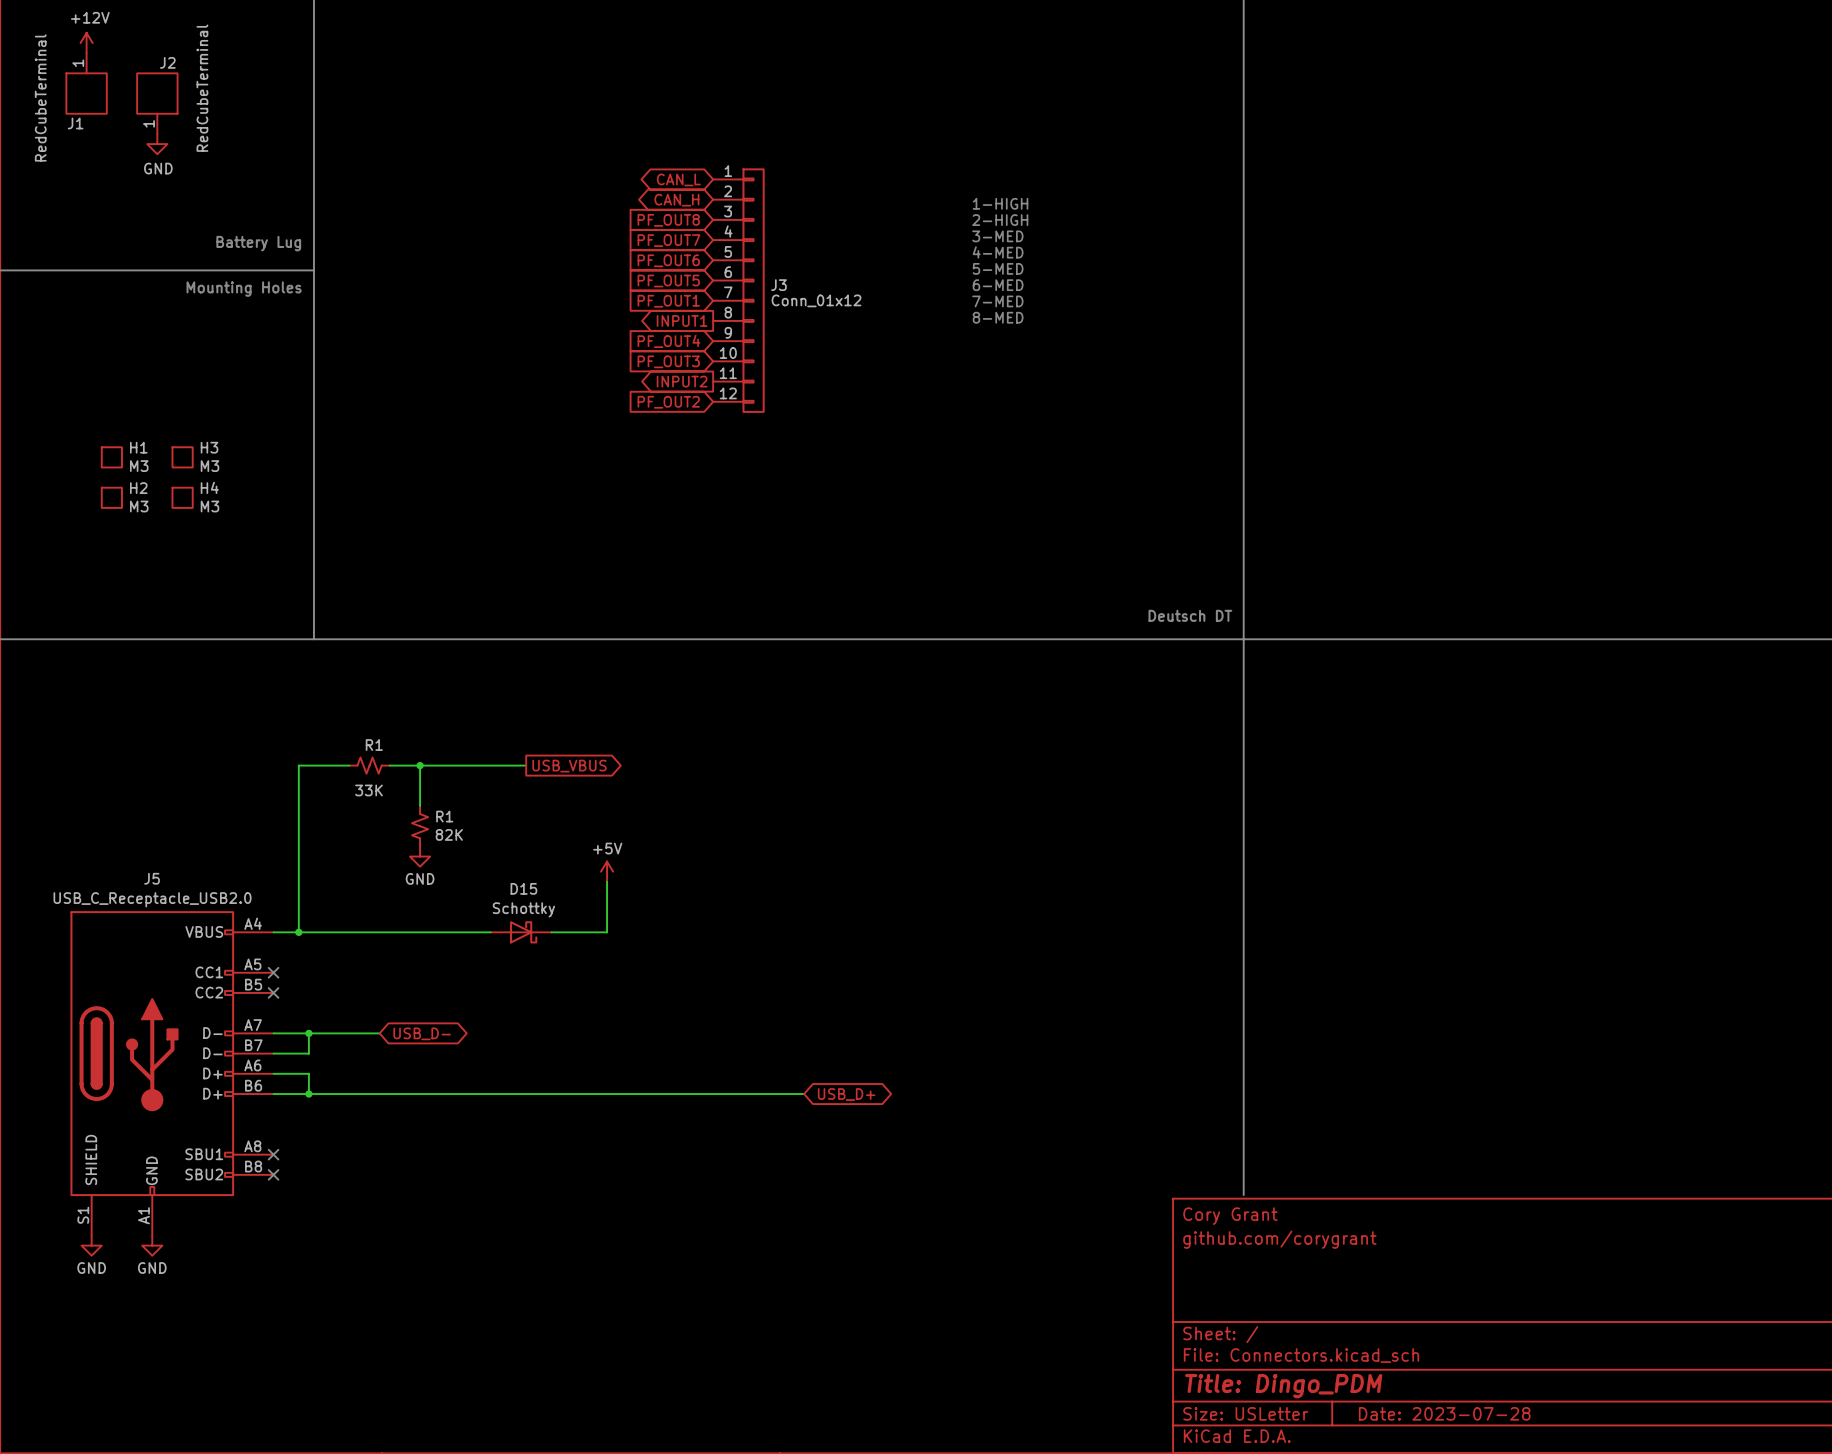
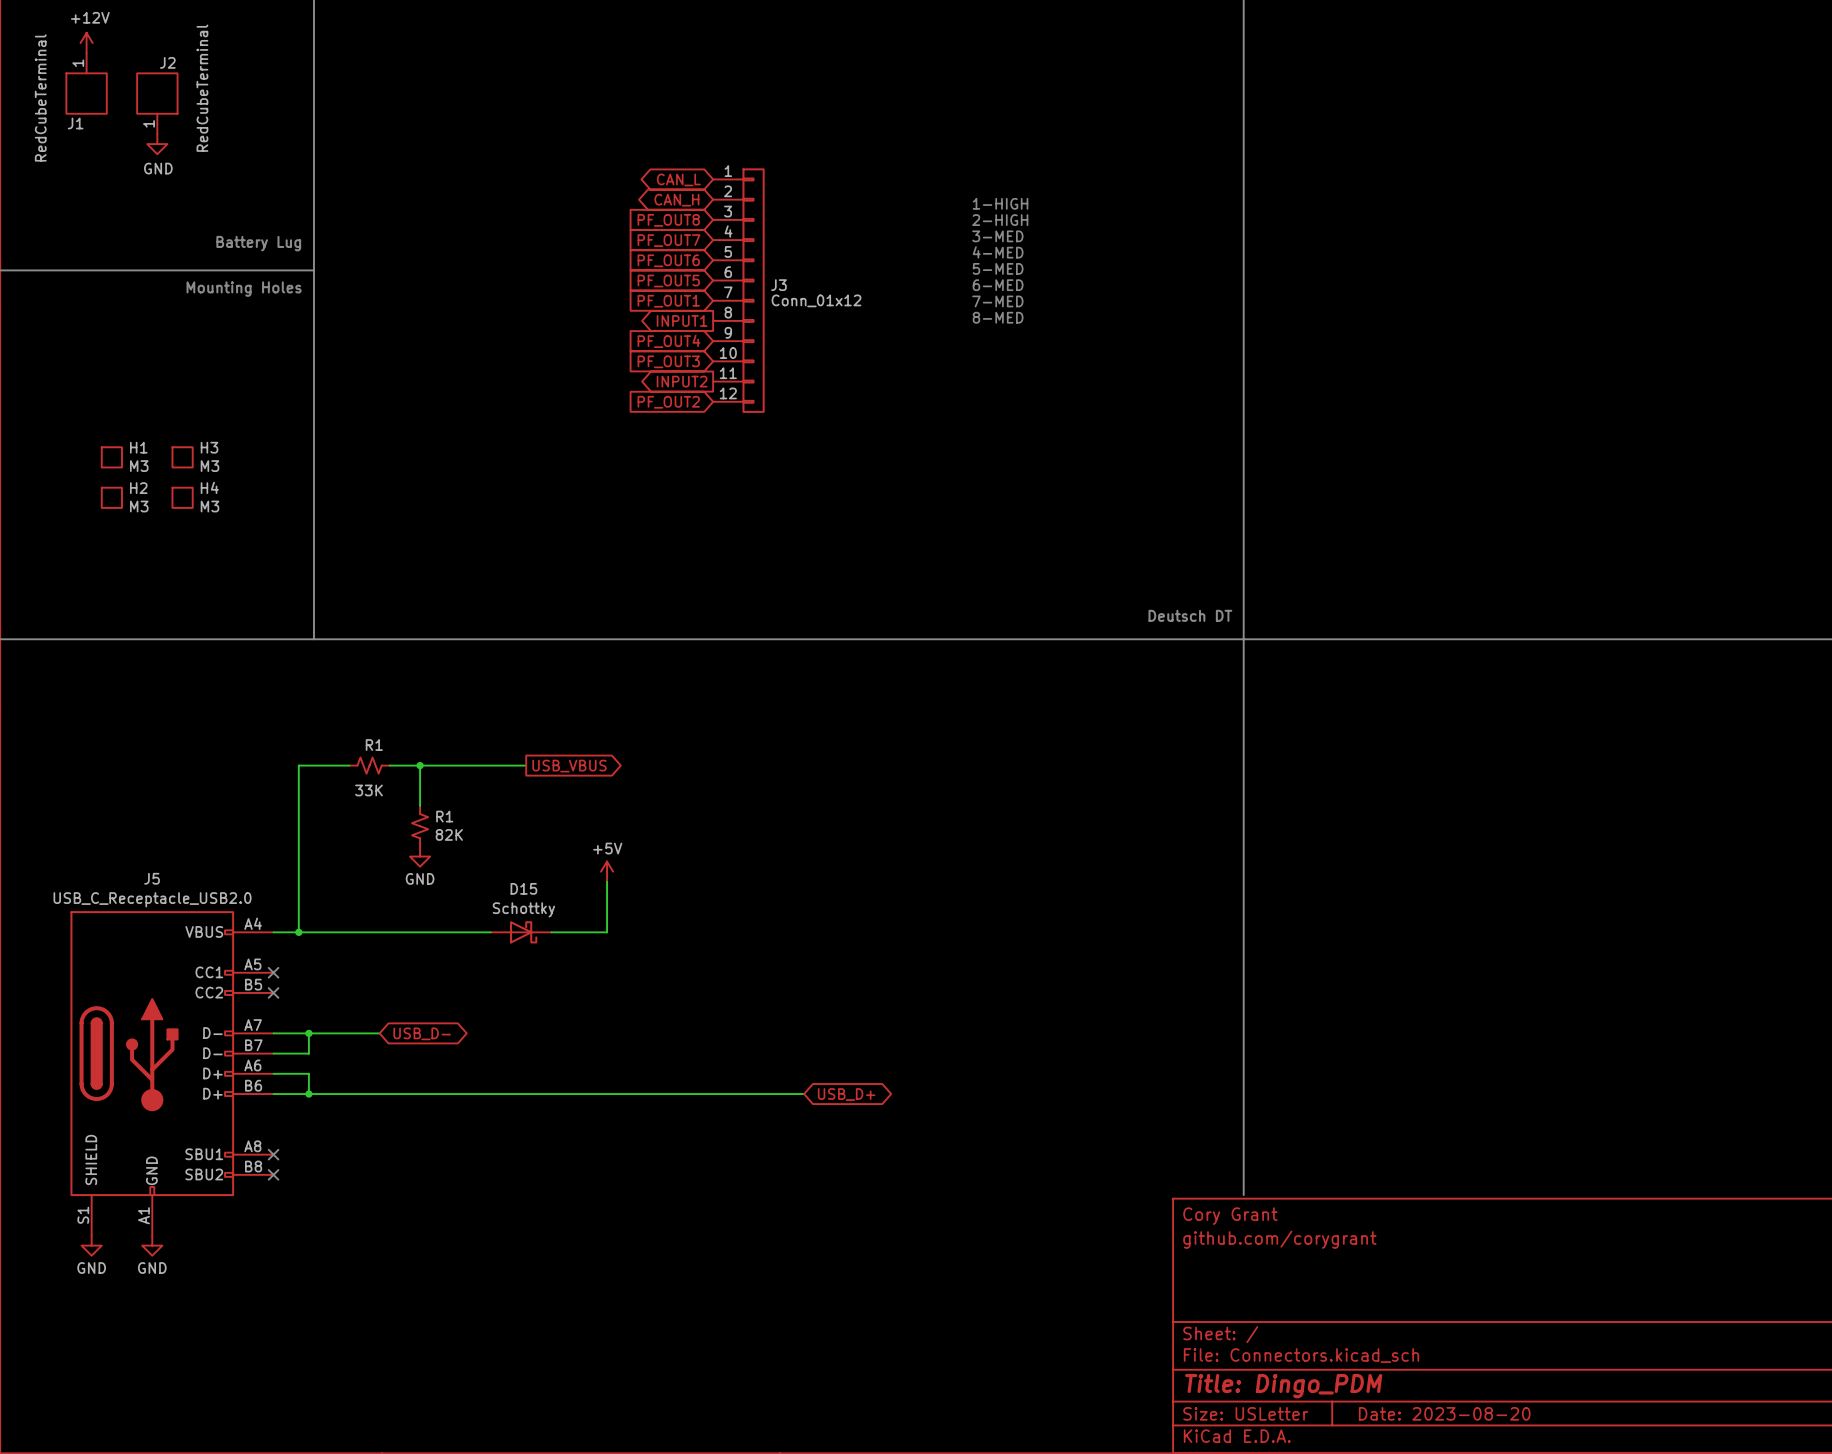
title block: Date: 2023-07-28 (1444, 1413) -> Date: 2023-08-20 (1444, 1413)

